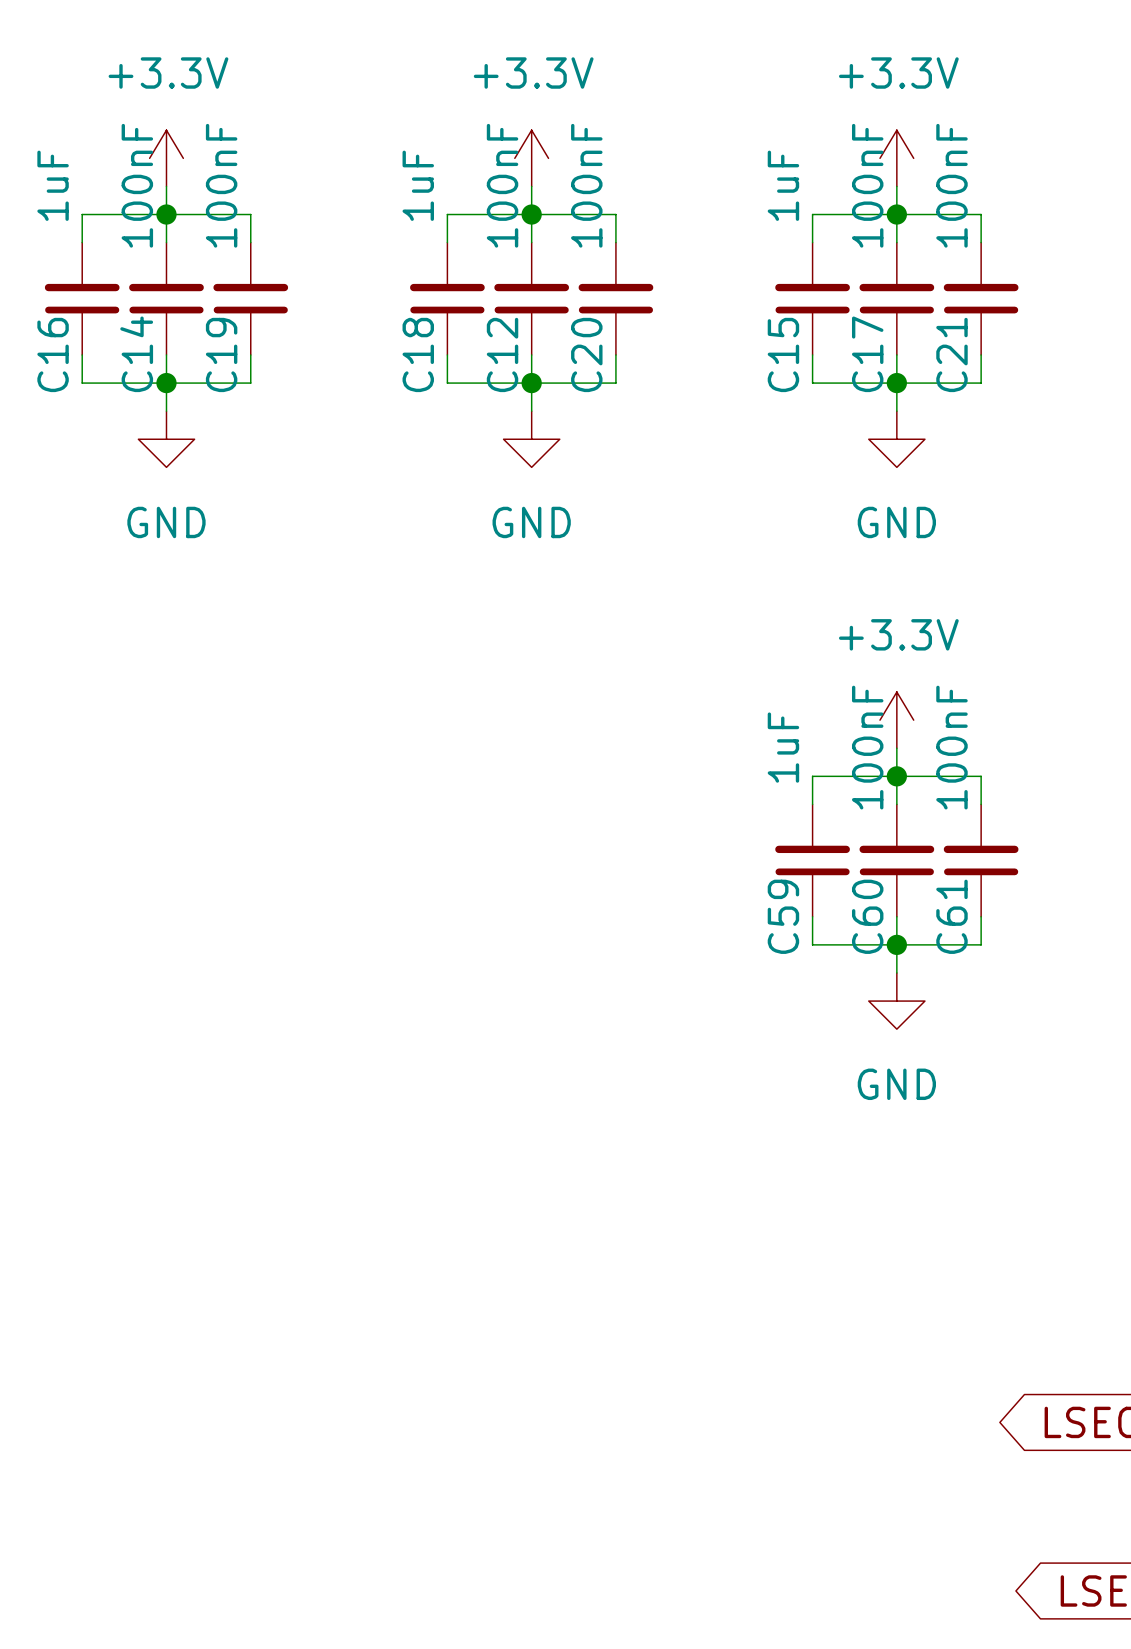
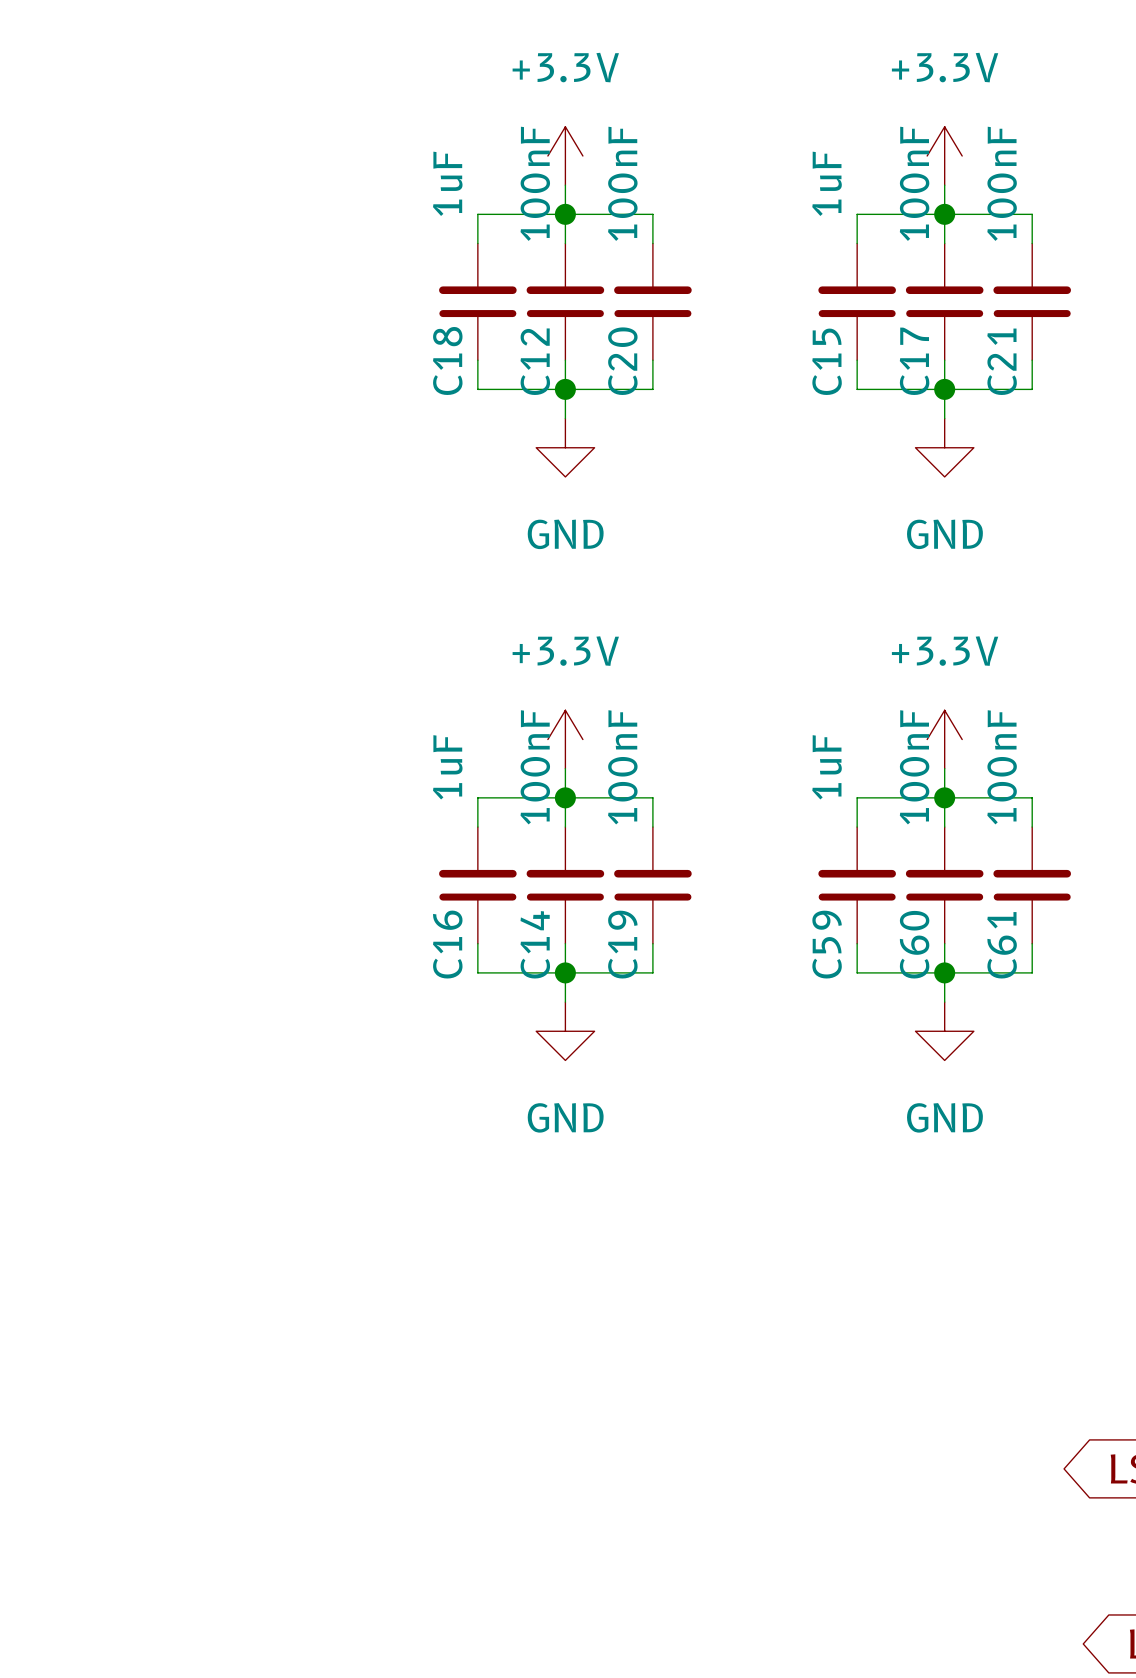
power symbol: +3.3V (166, 158) -> none
wire: (166, 186) (166, 242) -> none
junction: (166, 214) -> none
wire: (82, 242) (82, 214) (250, 214) (250, 242) -> none
C16 position: (82, 298) -> (477, 885)
C14 position: (166, 298) -> (565, 885)
C19 position: (250, 298) -> (652, 885)
wire: (82, 354) (82, 383) (250, 383) (250, 354) -> none
wire: (166, 354) (166, 411) -> (565, 768) (565, 827)
junction: (166, 383) -> none
power symbol: GND (166, 439) -> none
power symbol: none -> +3.3V (565, 739)
junction: none -> (565, 797)
wire: none -> (477, 827) (477, 797) (652, 797) (652, 827)
wire: none -> (477, 943) (477, 972) (652, 972) (652, 943)
wire: none -> (565, 943) (565, 1002)
junction: none -> (565, 972)
power symbol: none -> GND (565, 1031)

